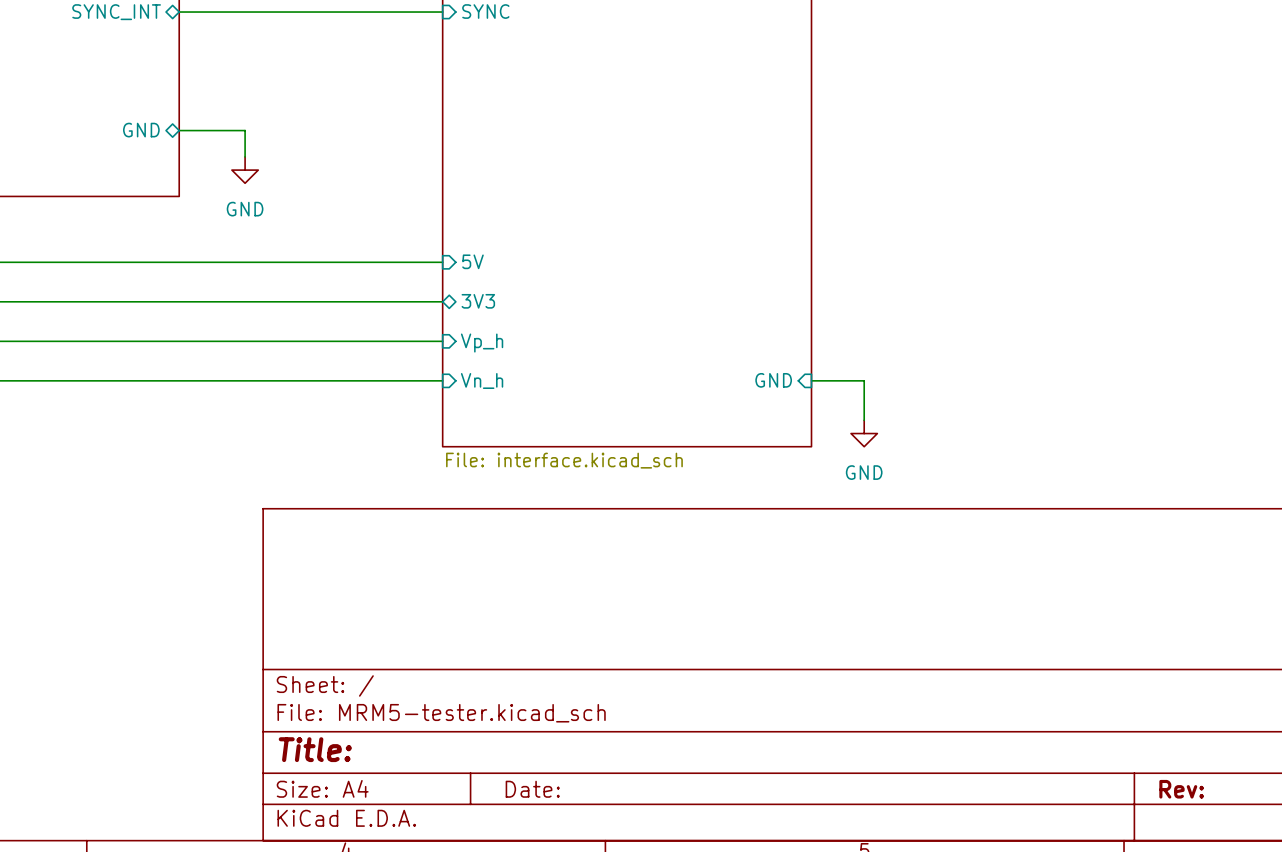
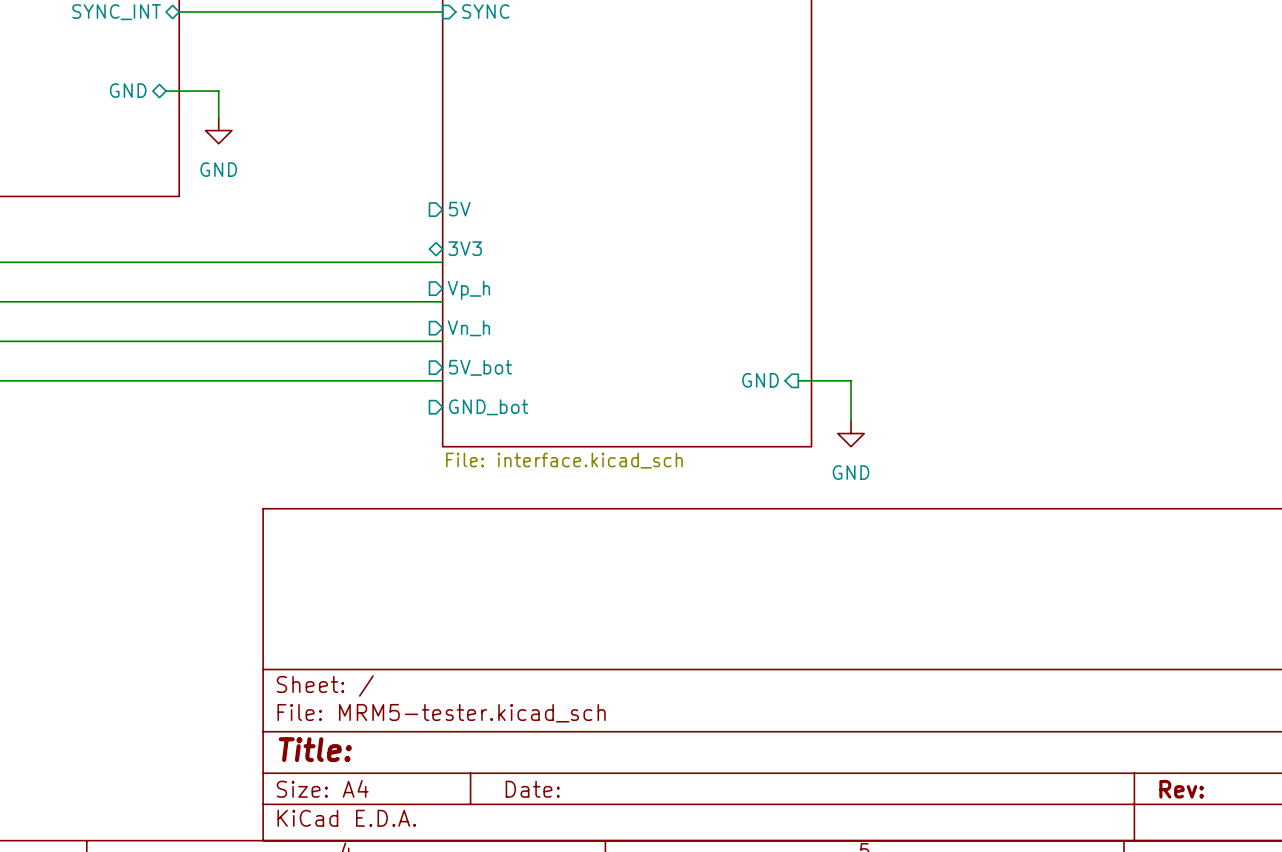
wire: none -> (166, 91) (218, 91) (218, 117)
sheet pin position: GND (141, 130) -> GND (128, 90)
wire: (179, 130) (245, 130) (245, 156) -> none
power symbol position: GND (245, 170) -> GND (218, 130)
sheet pin position: 5V (472, 261) -> 5V (459, 209)
sheet pin position: 3V3 (478, 301) -> 3V3 (465, 248)
sheet pin position: Vp_h (482, 343) -> Vp_h (468, 290)
sheet pin: none -> 5V_bot (480, 367)
sheet pin position: Vn_h (482, 380) -> Vn_h (468, 328)
sheet pin position: GND (773, 380) -> GND (760, 380)
wire: none -> (798, 380) (811, 380)
wire: (851, 380) (864, 380) (864, 420) -> (851, 380) (851, 420)
sheet pin: none -> GND_bot (488, 407)
power symbol position: GND (864, 433) -> GND (851, 433)

